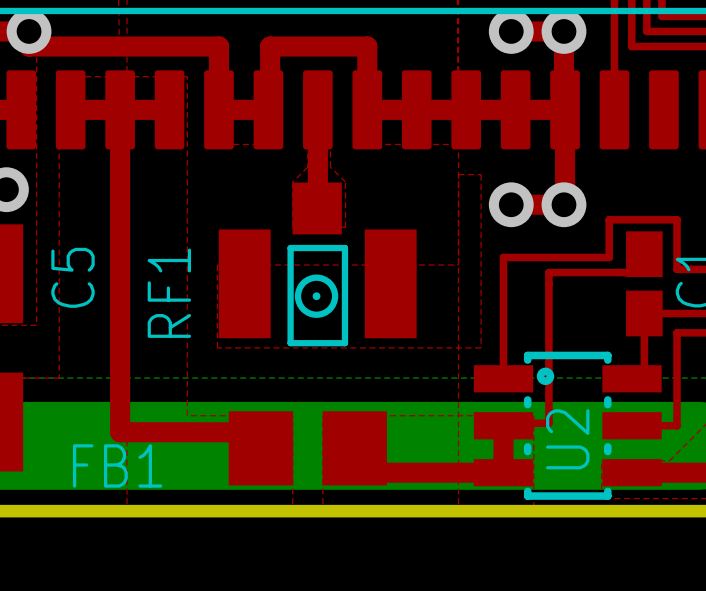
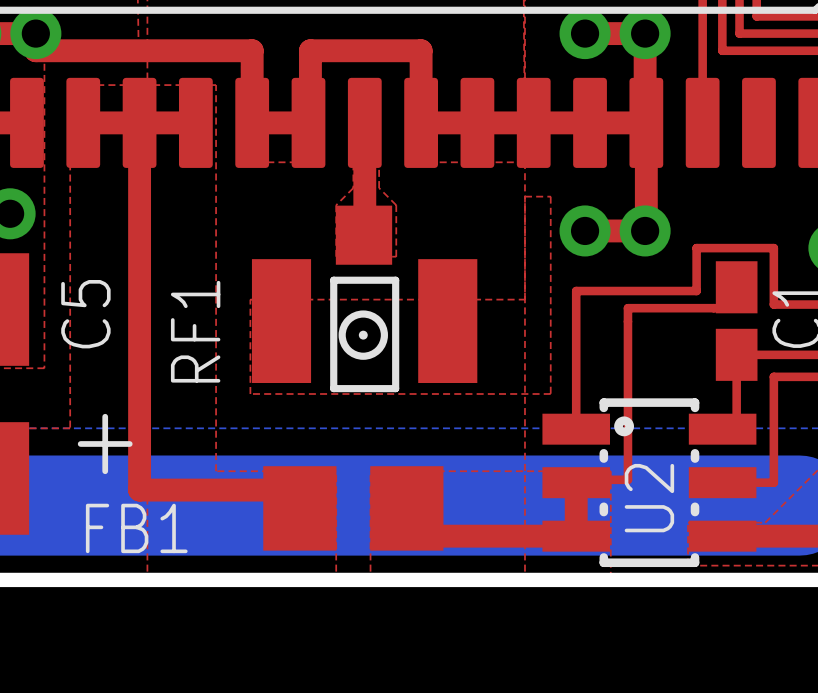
text: none -> + (105, 443)

